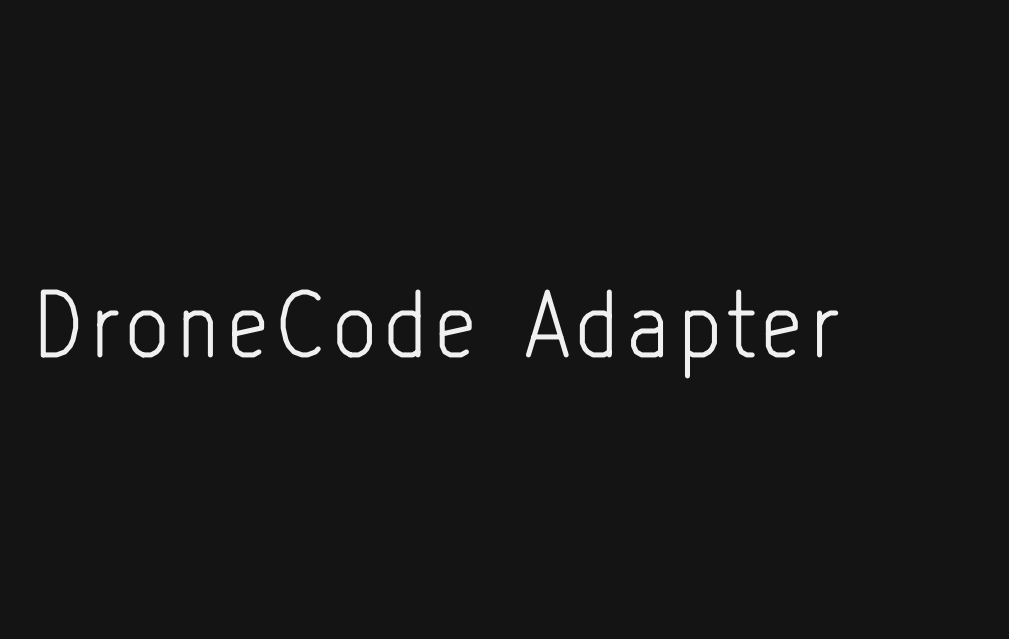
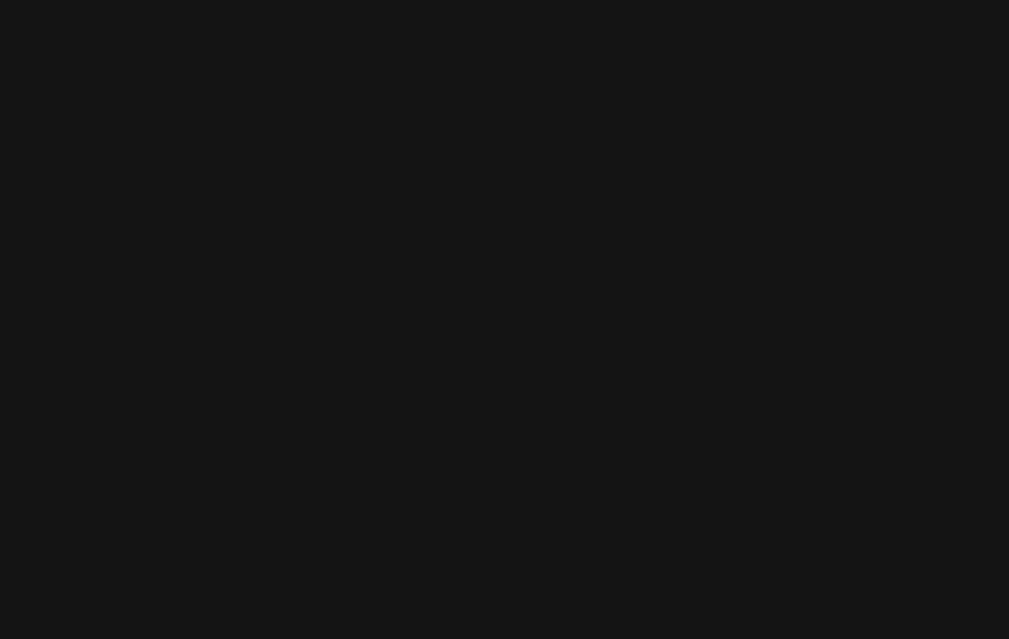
text: DroneCode Adapter (439, 333) -> none

